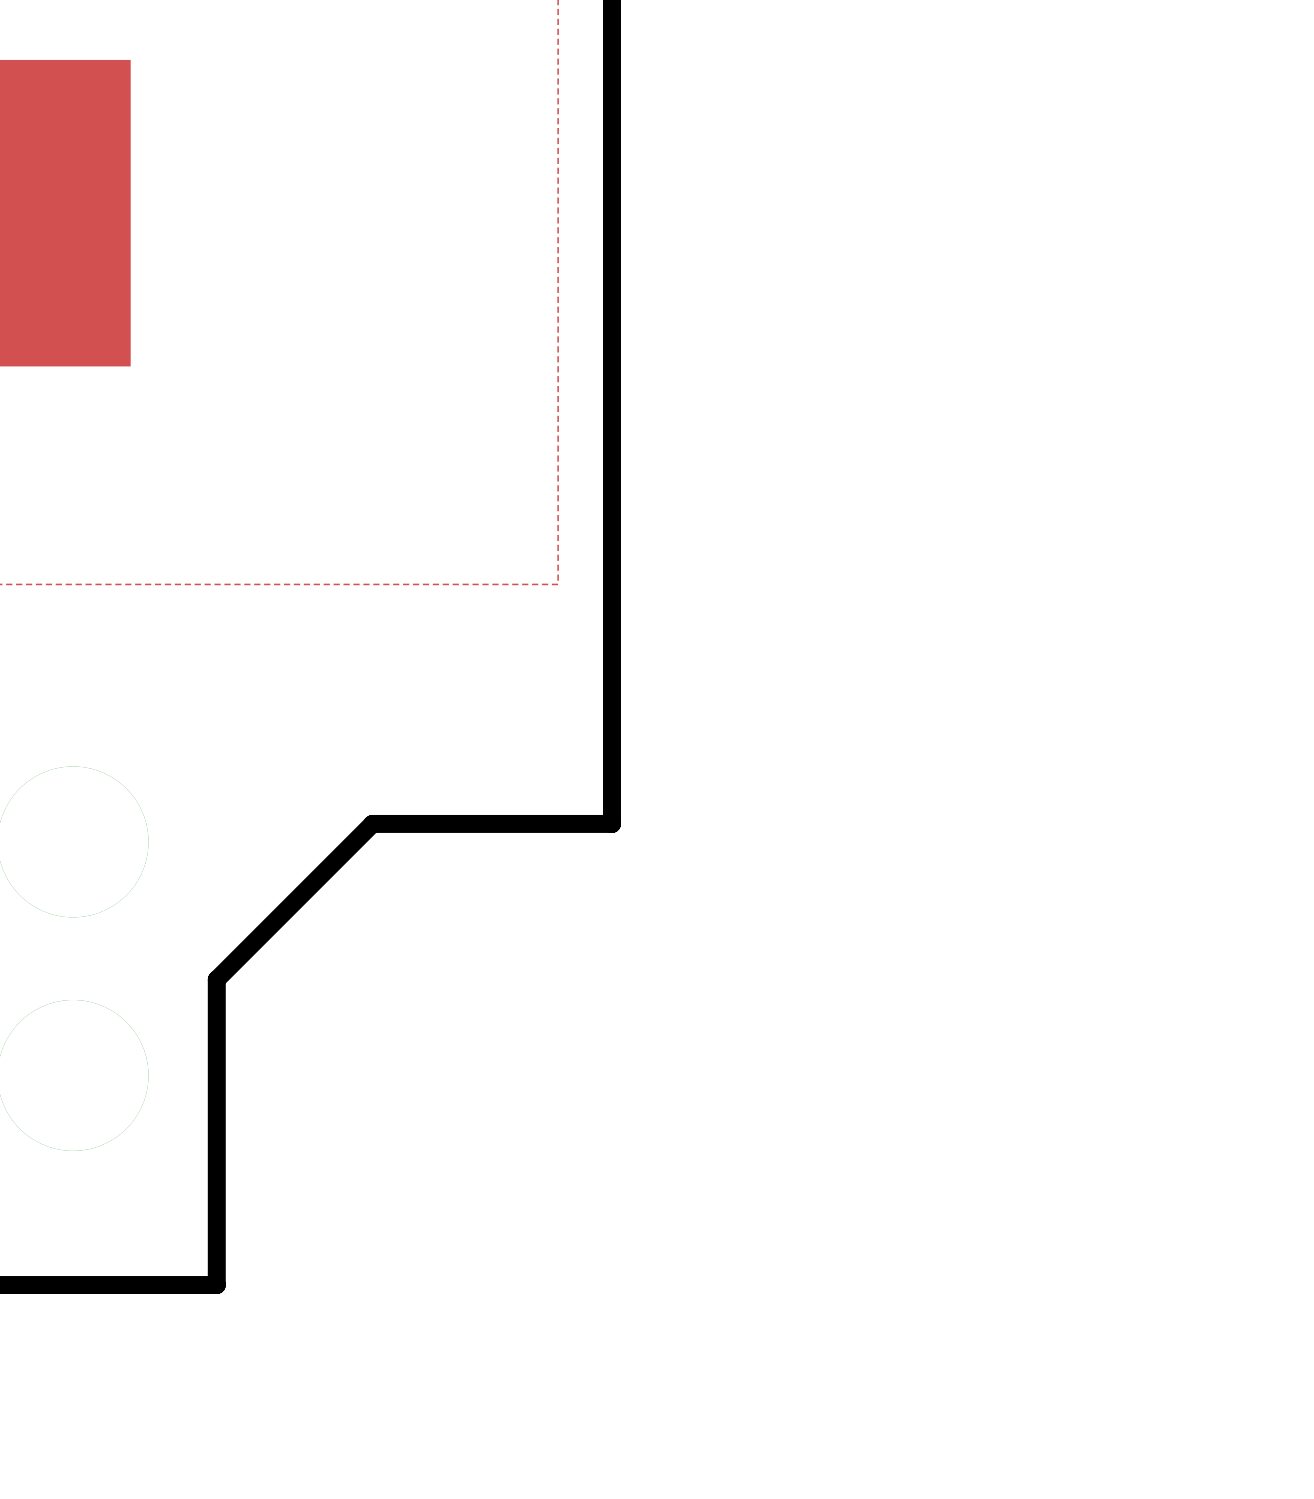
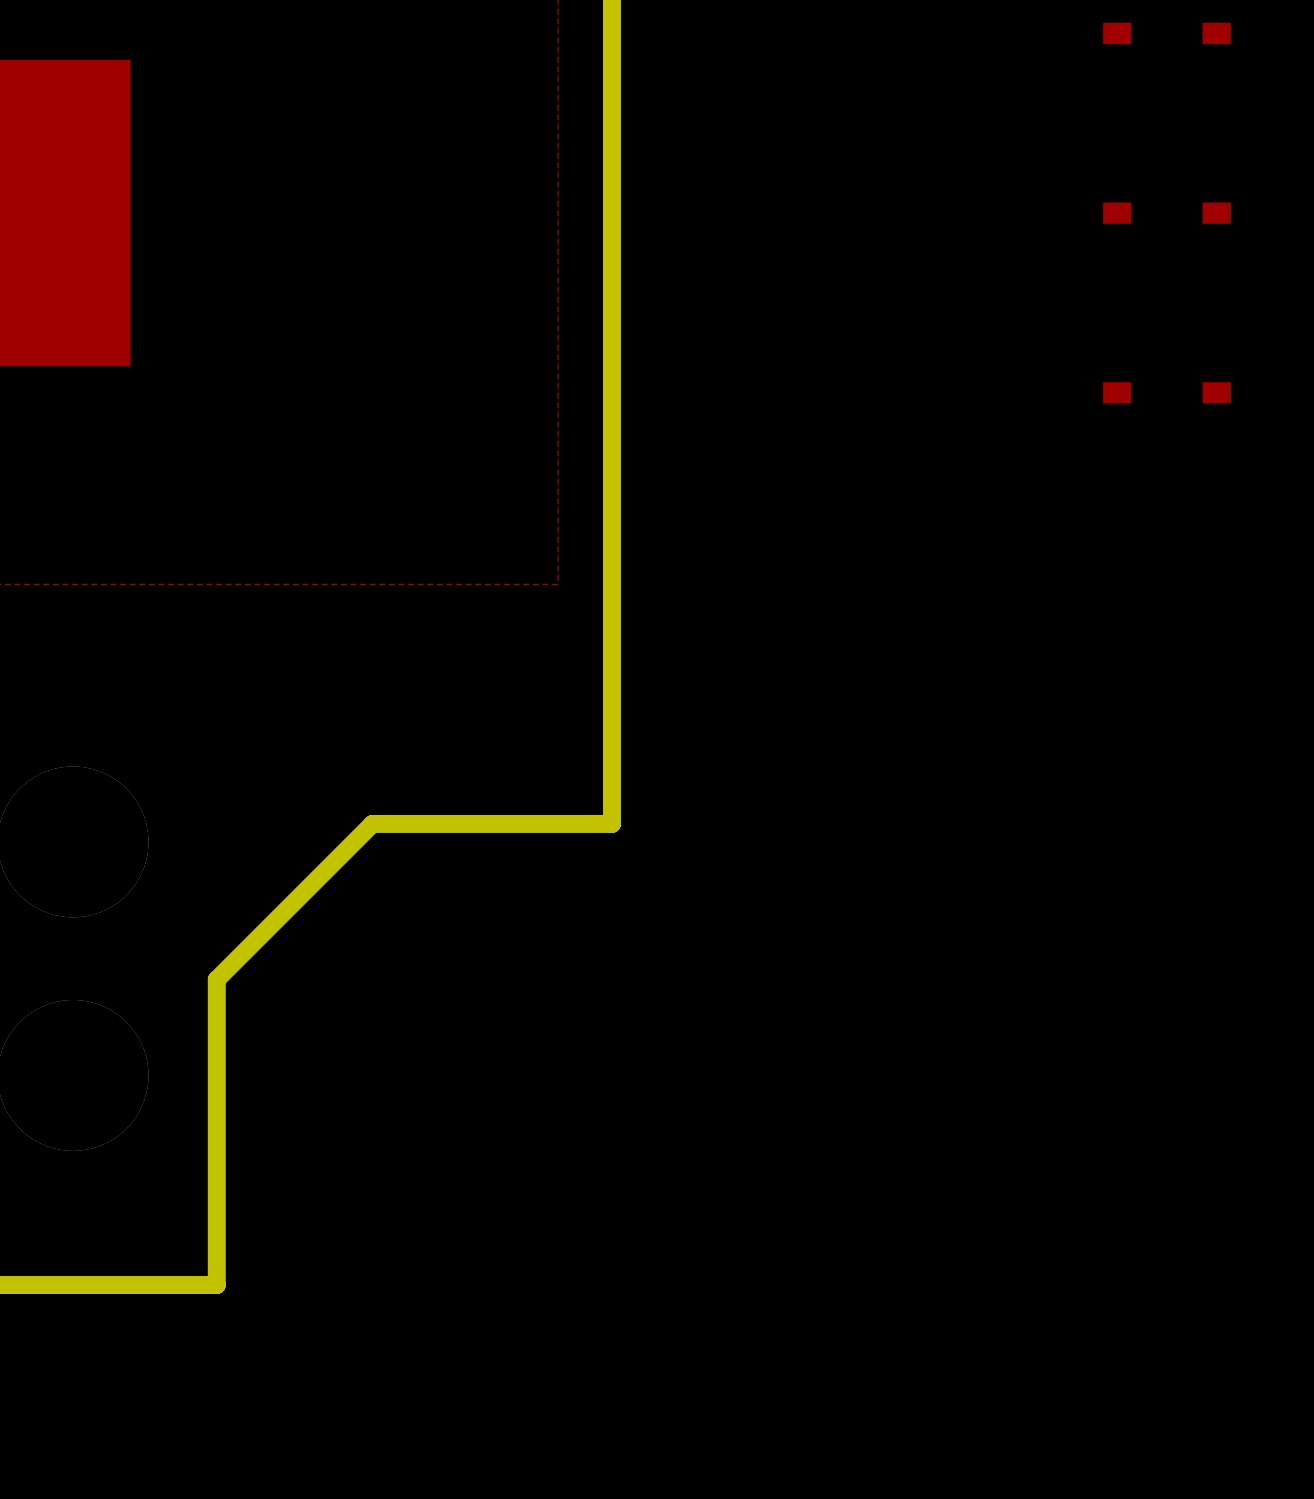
part: none -> (1167, 33)
part: none -> (1167, 213)
part: none -> (1167, 392)

